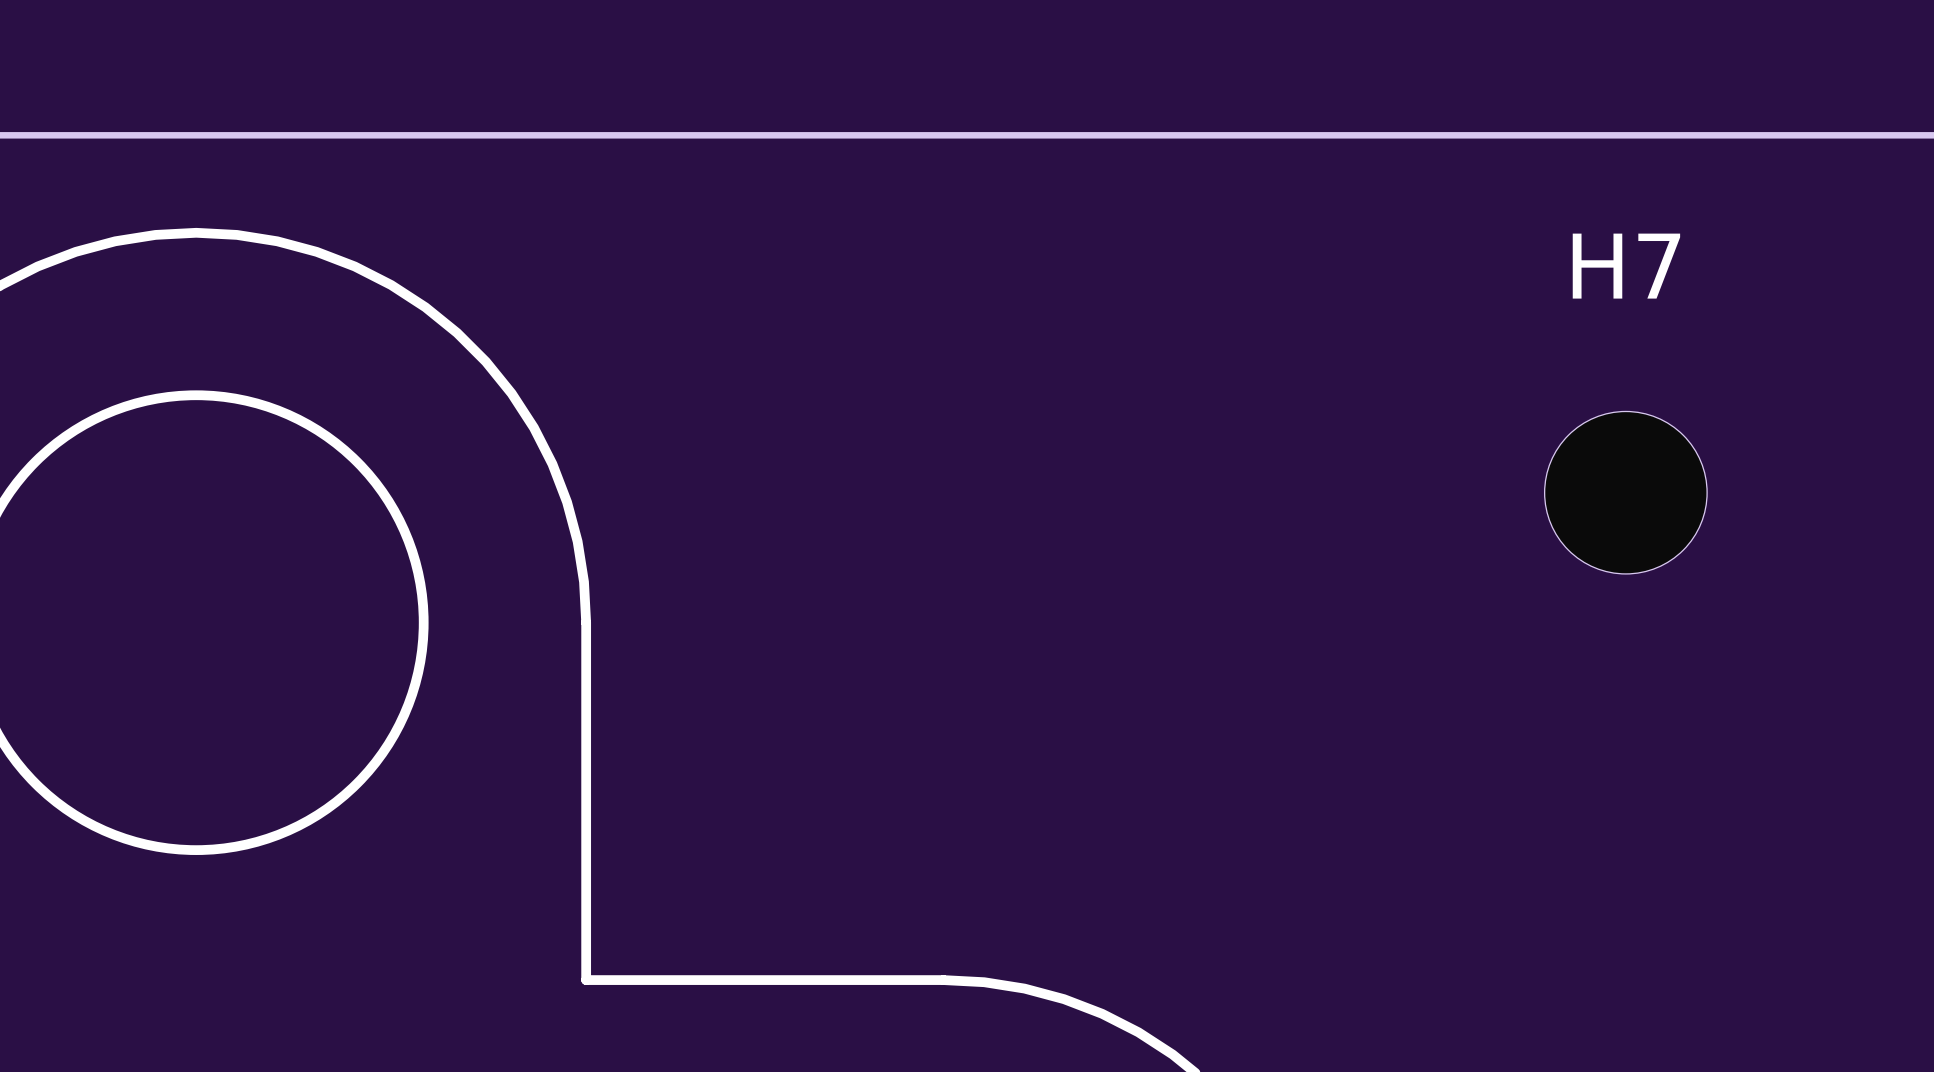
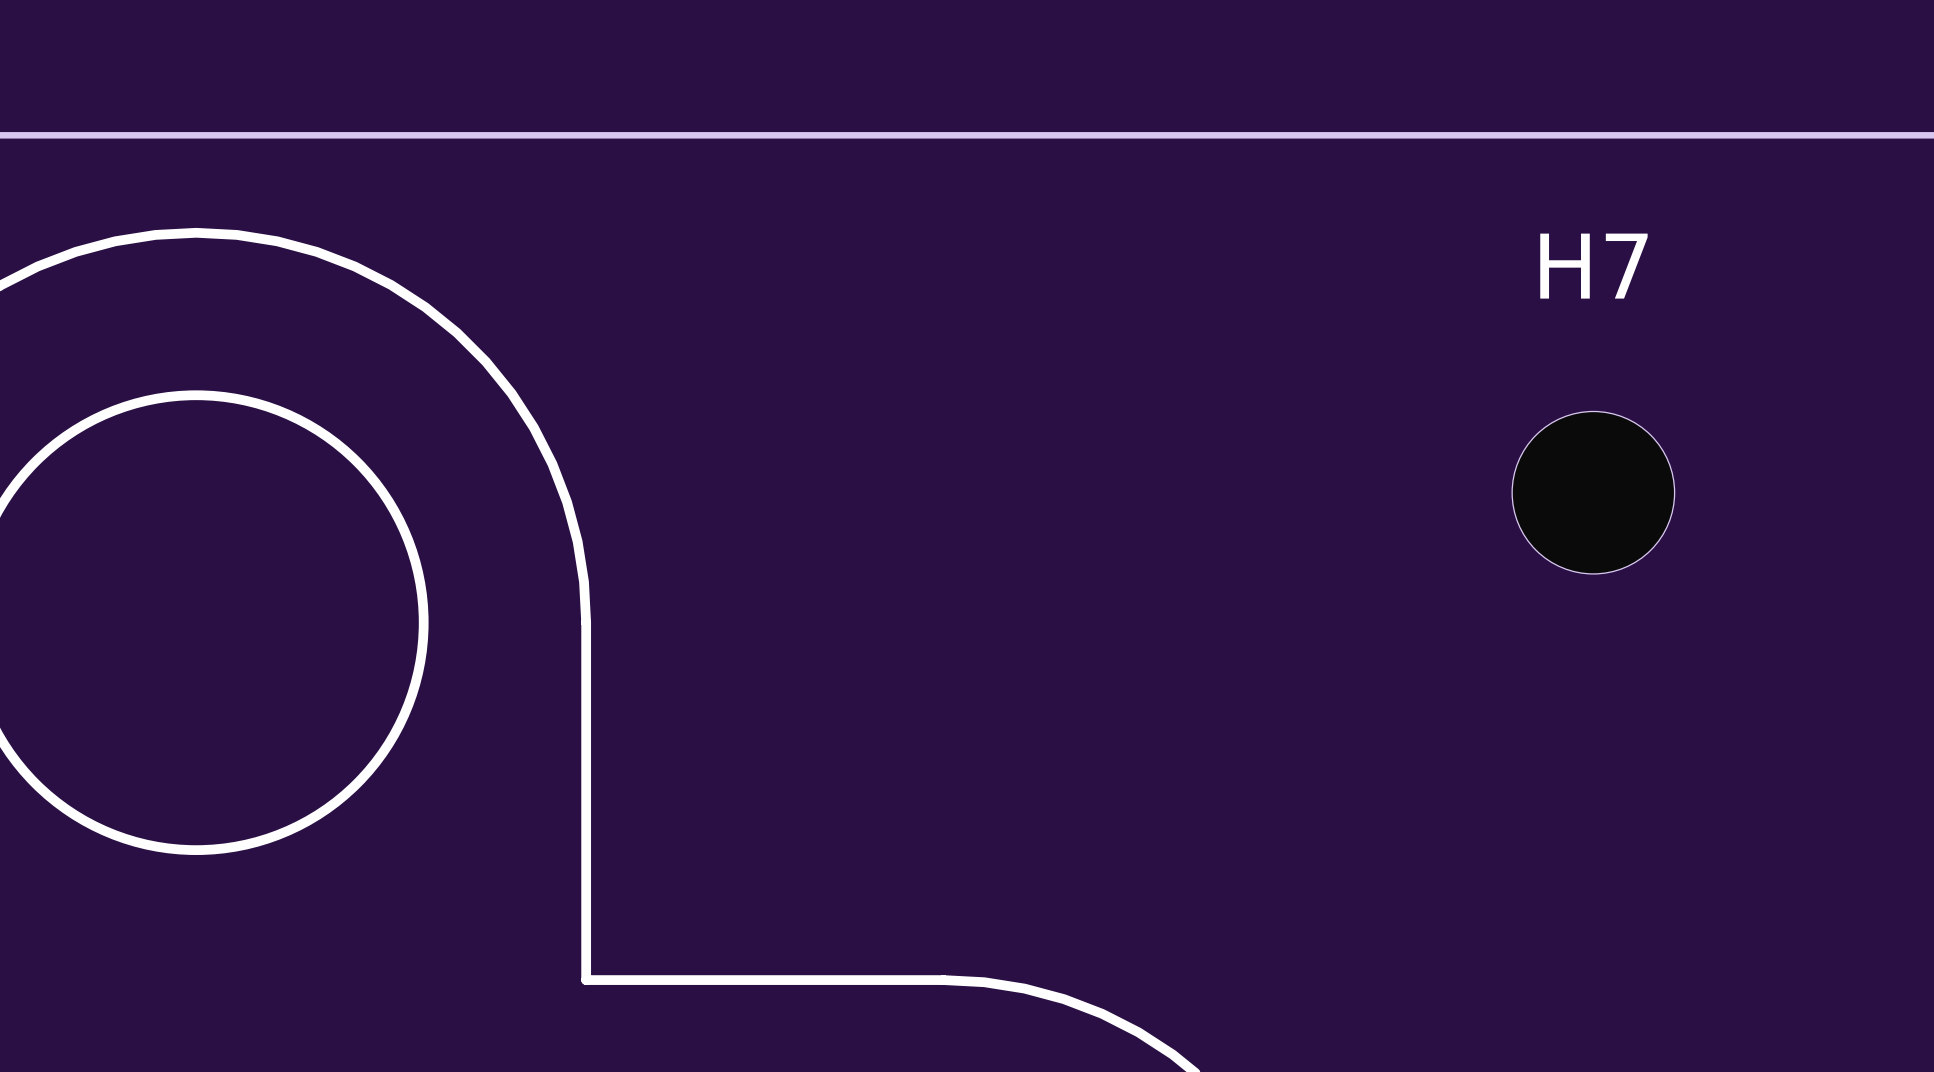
H7 position: (1625, 492) -> (1593, 492)

